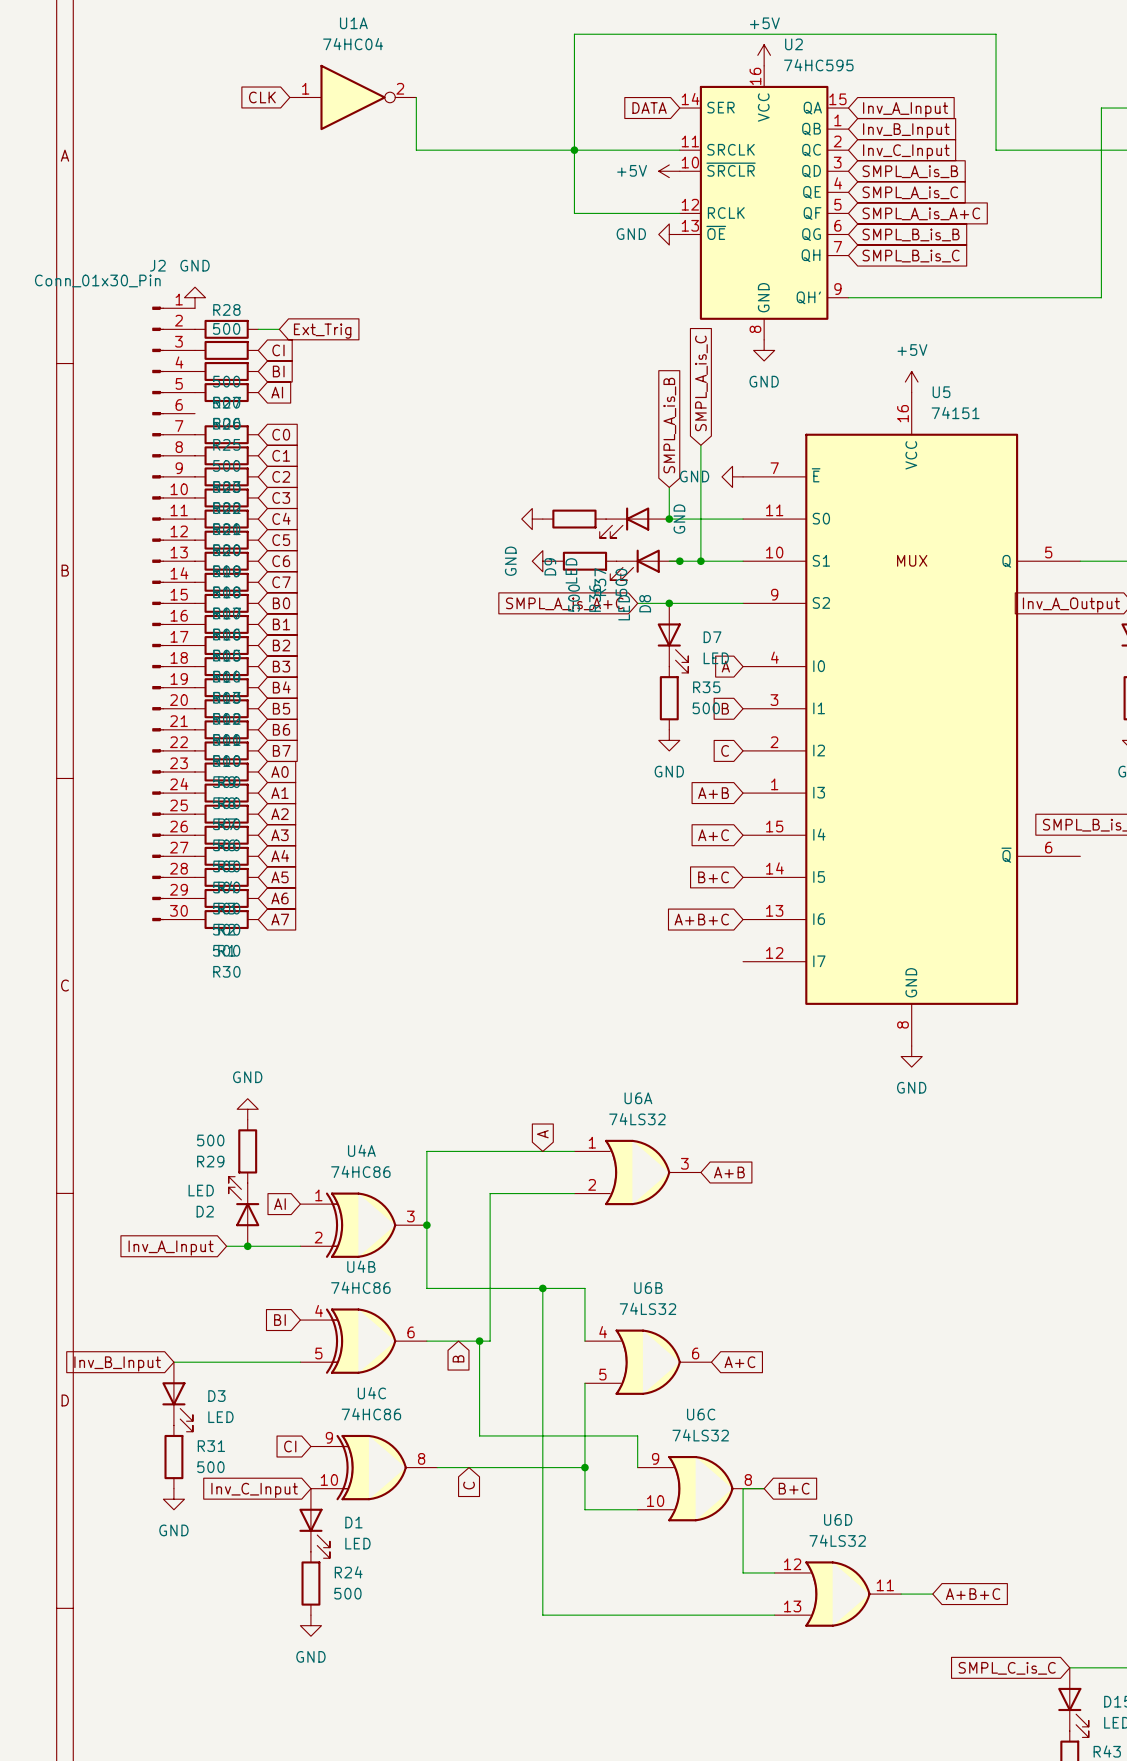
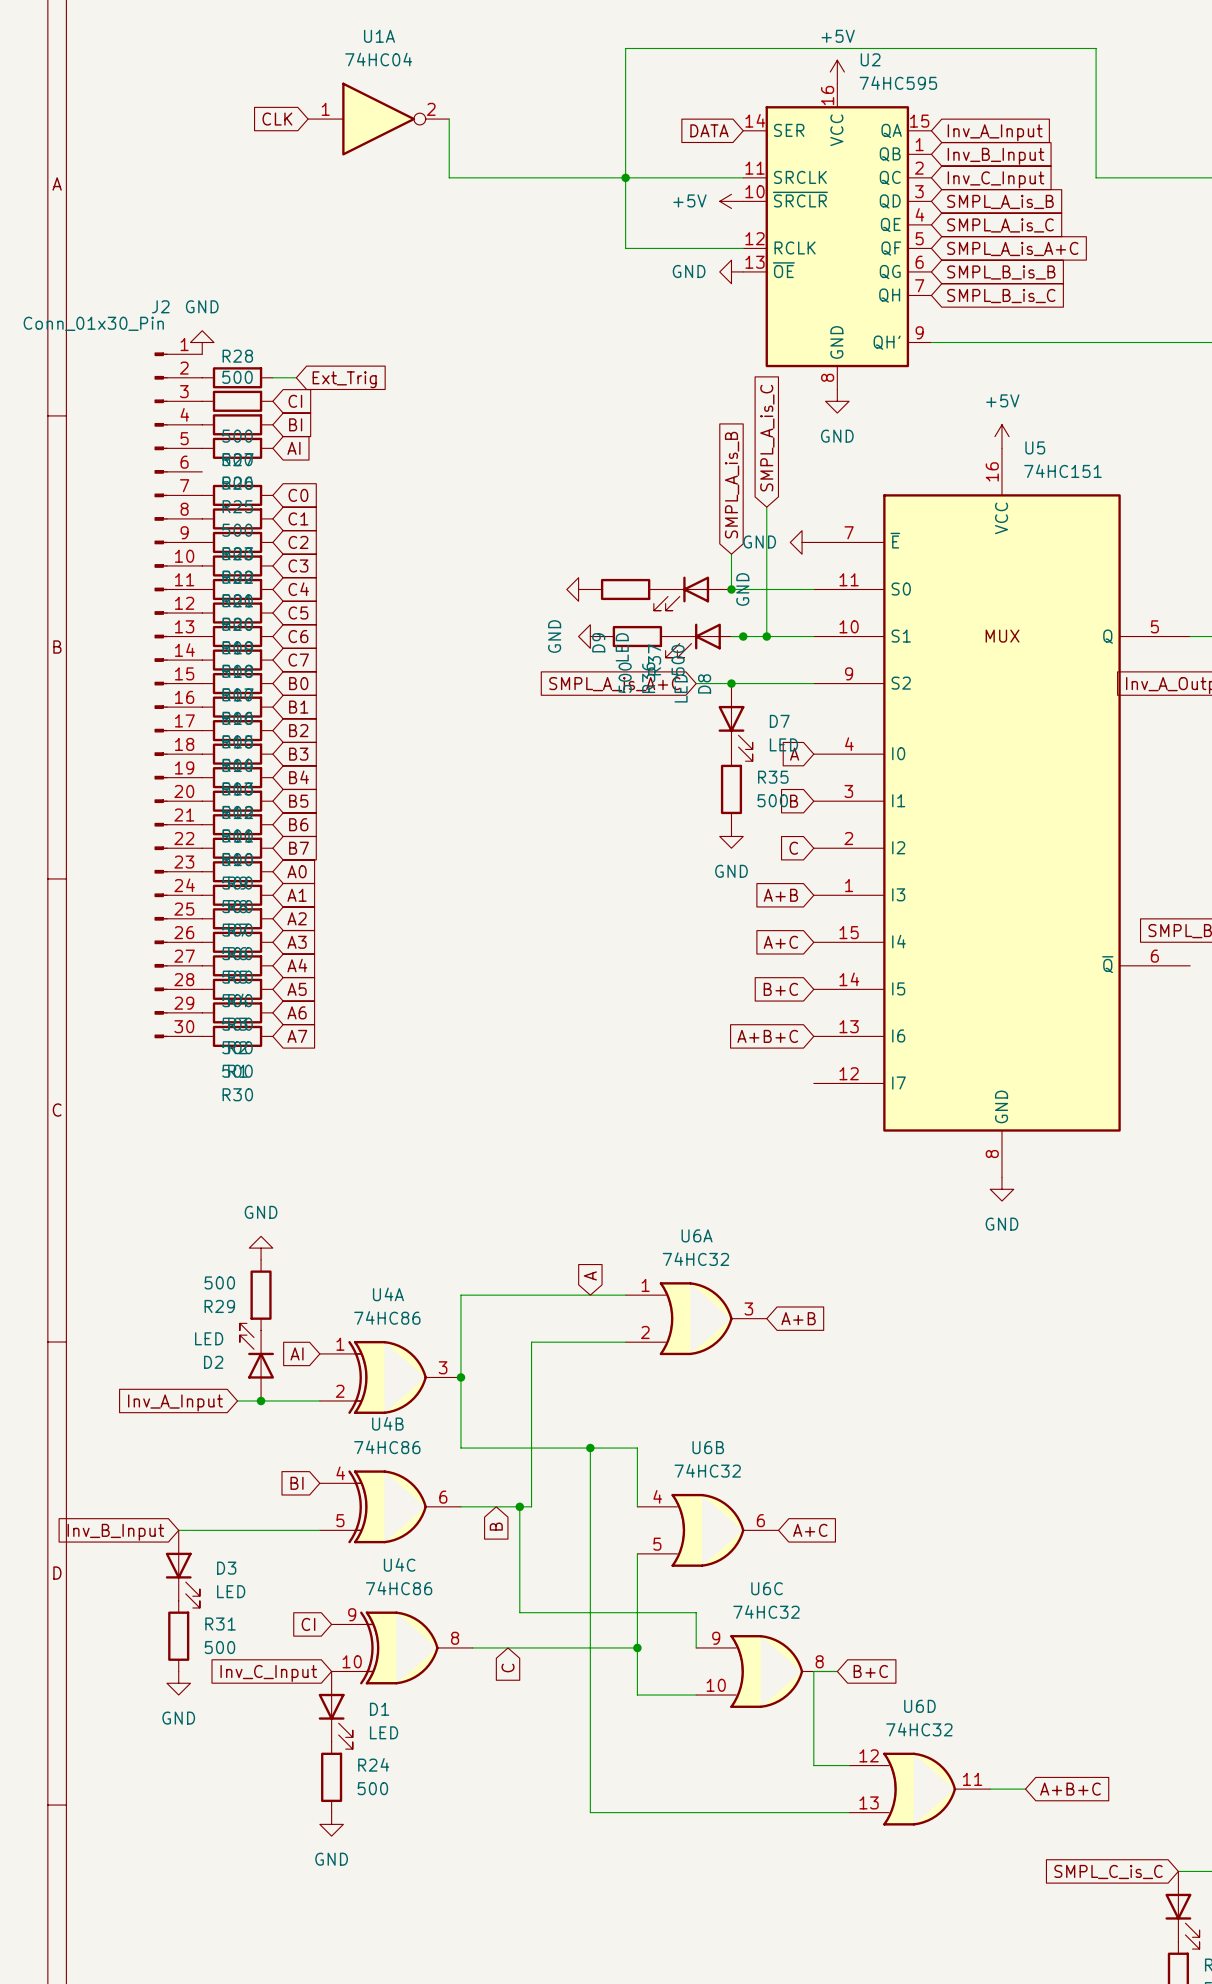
U5 value: 74151 (955, 413) -> 74HC151 (1062, 471)
U6A value: 74LS32 (637, 1119) -> 74HC32 (695, 1259)
U6B value: 74LS32 (647, 1308) -> 74HC32 (707, 1470)
U6C value: 74LS32 (700, 1435) -> 74HC32 (766, 1611)
U6D value: 74LS32 (837, 1540) -> 74HC32 (919, 1729)

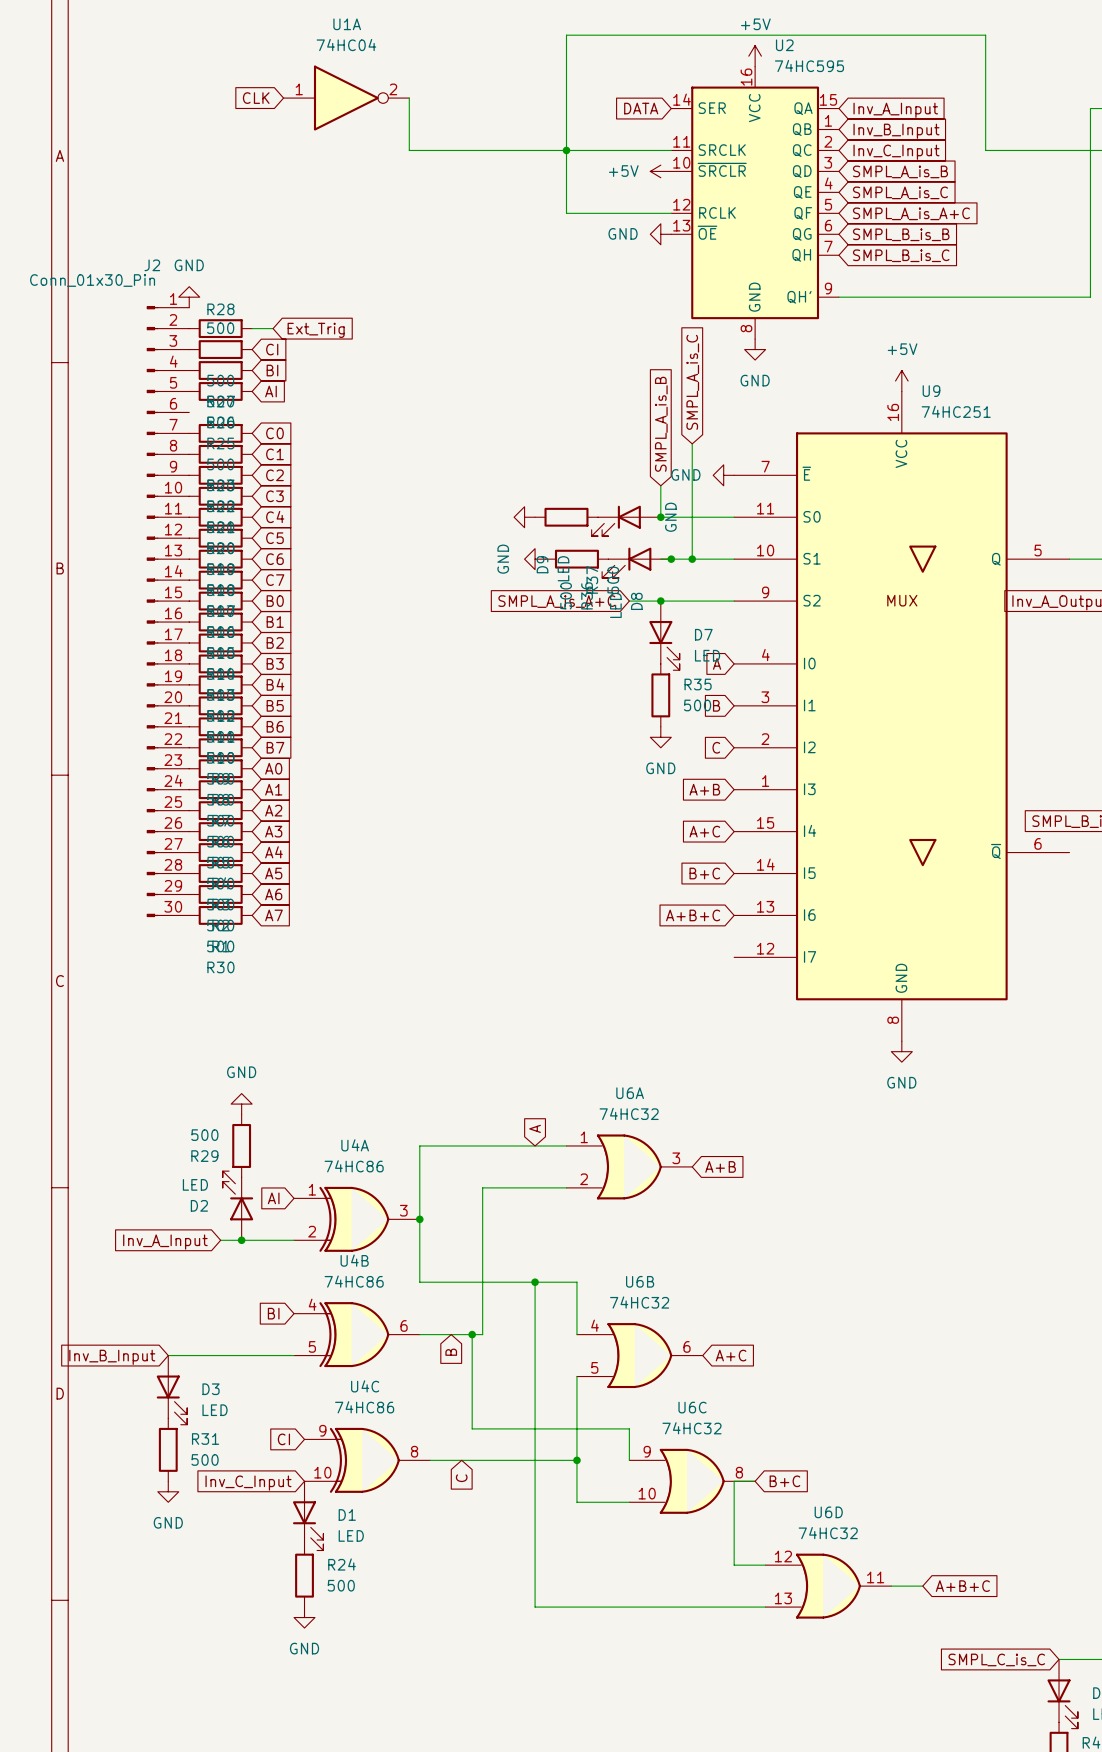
U5: 74HC151 (1001, 812) -> none
U9: none -> 74HC251 (901, 716)

